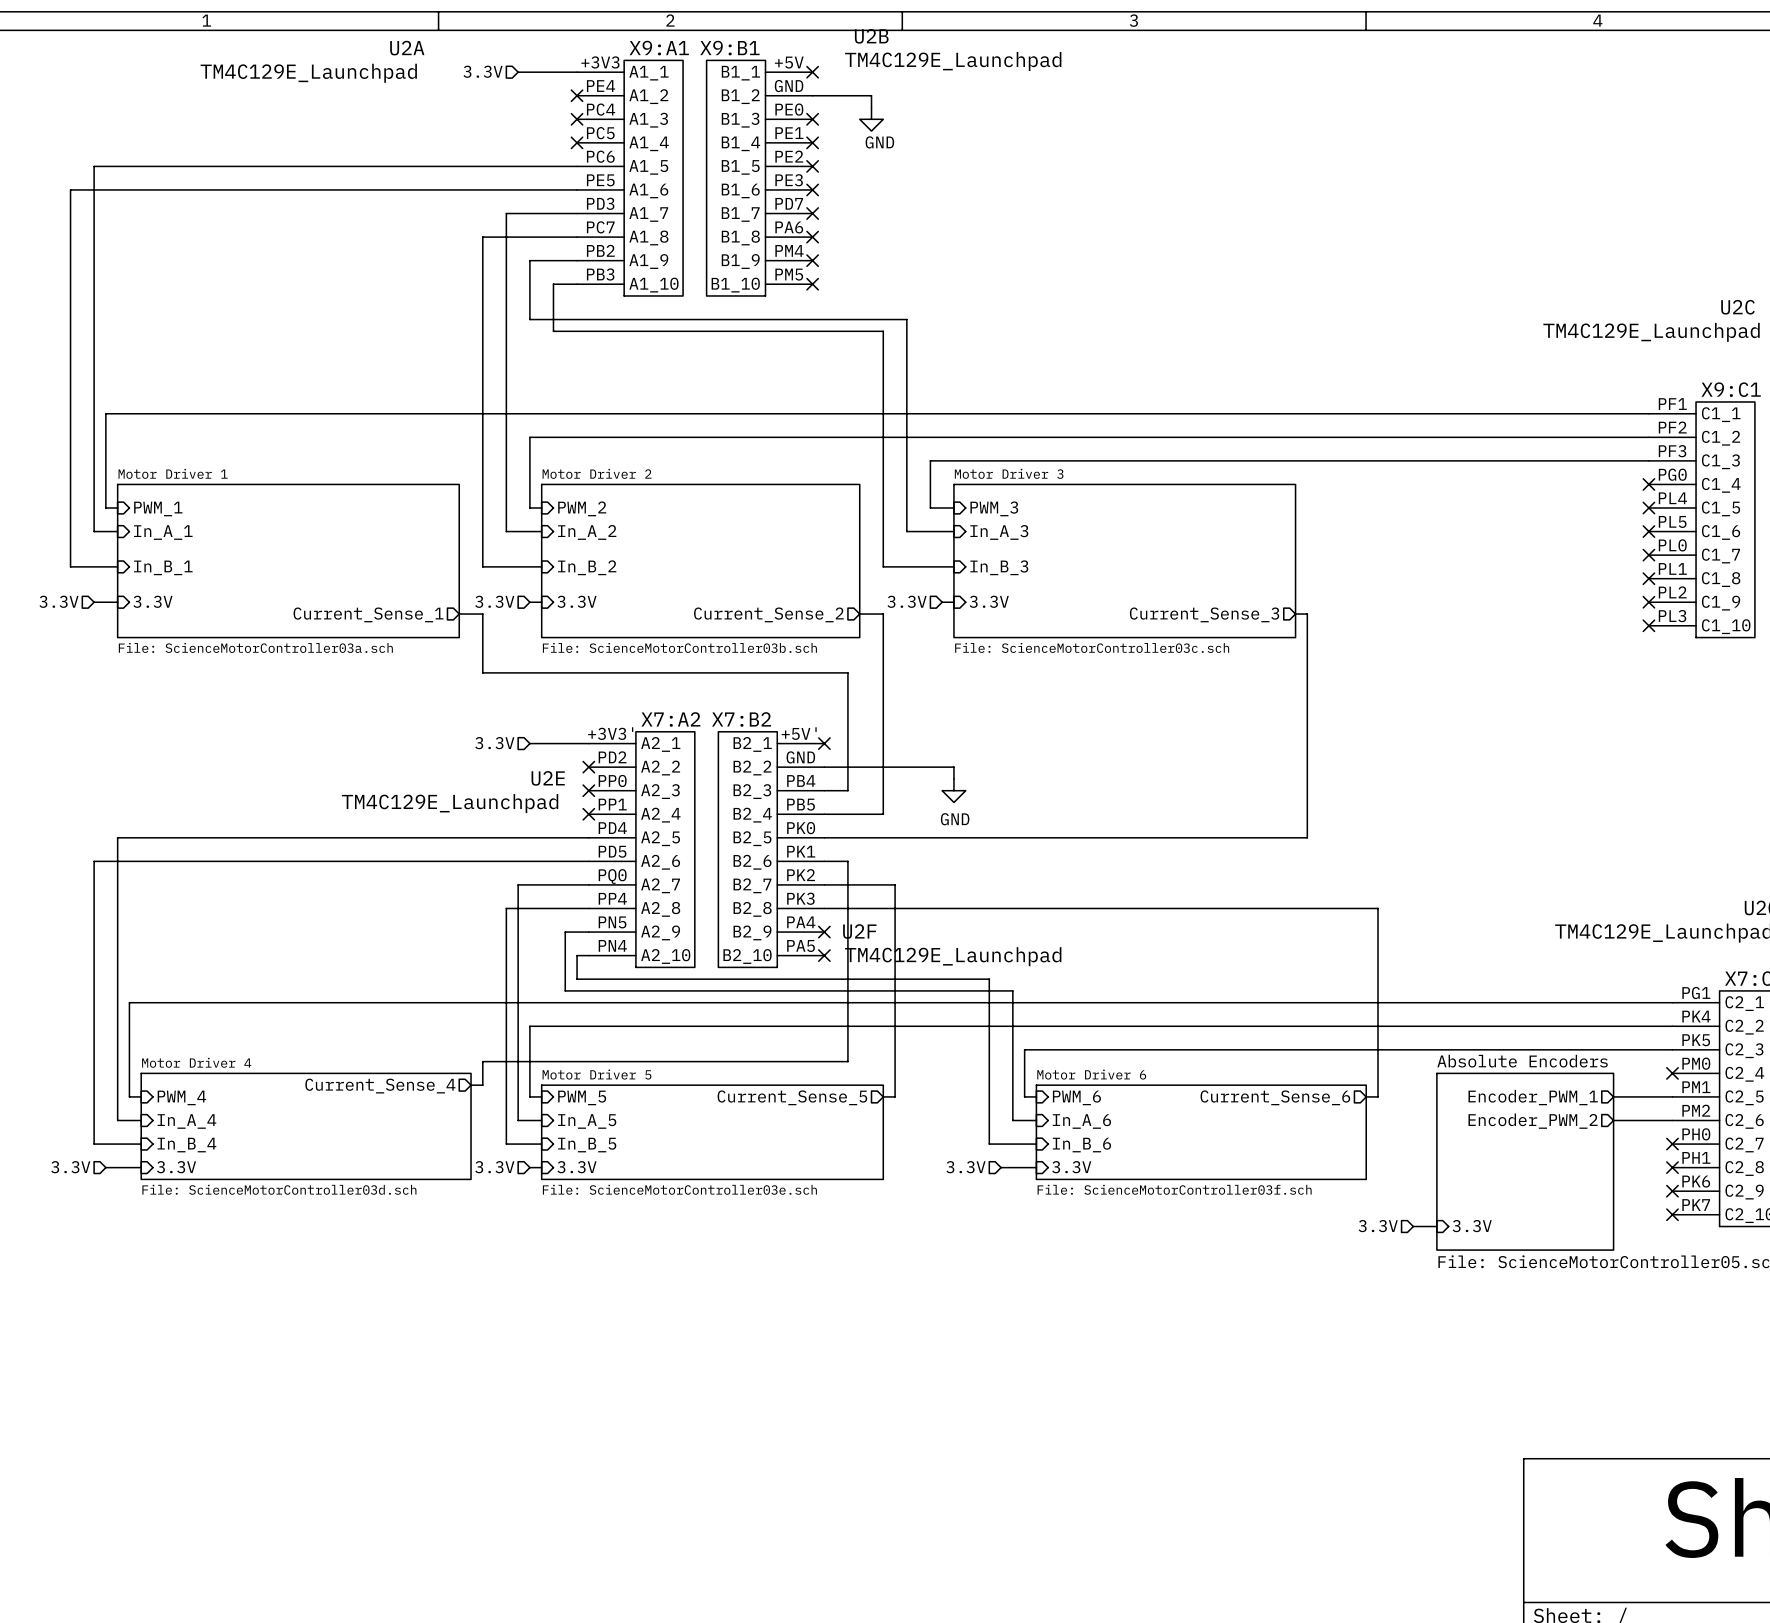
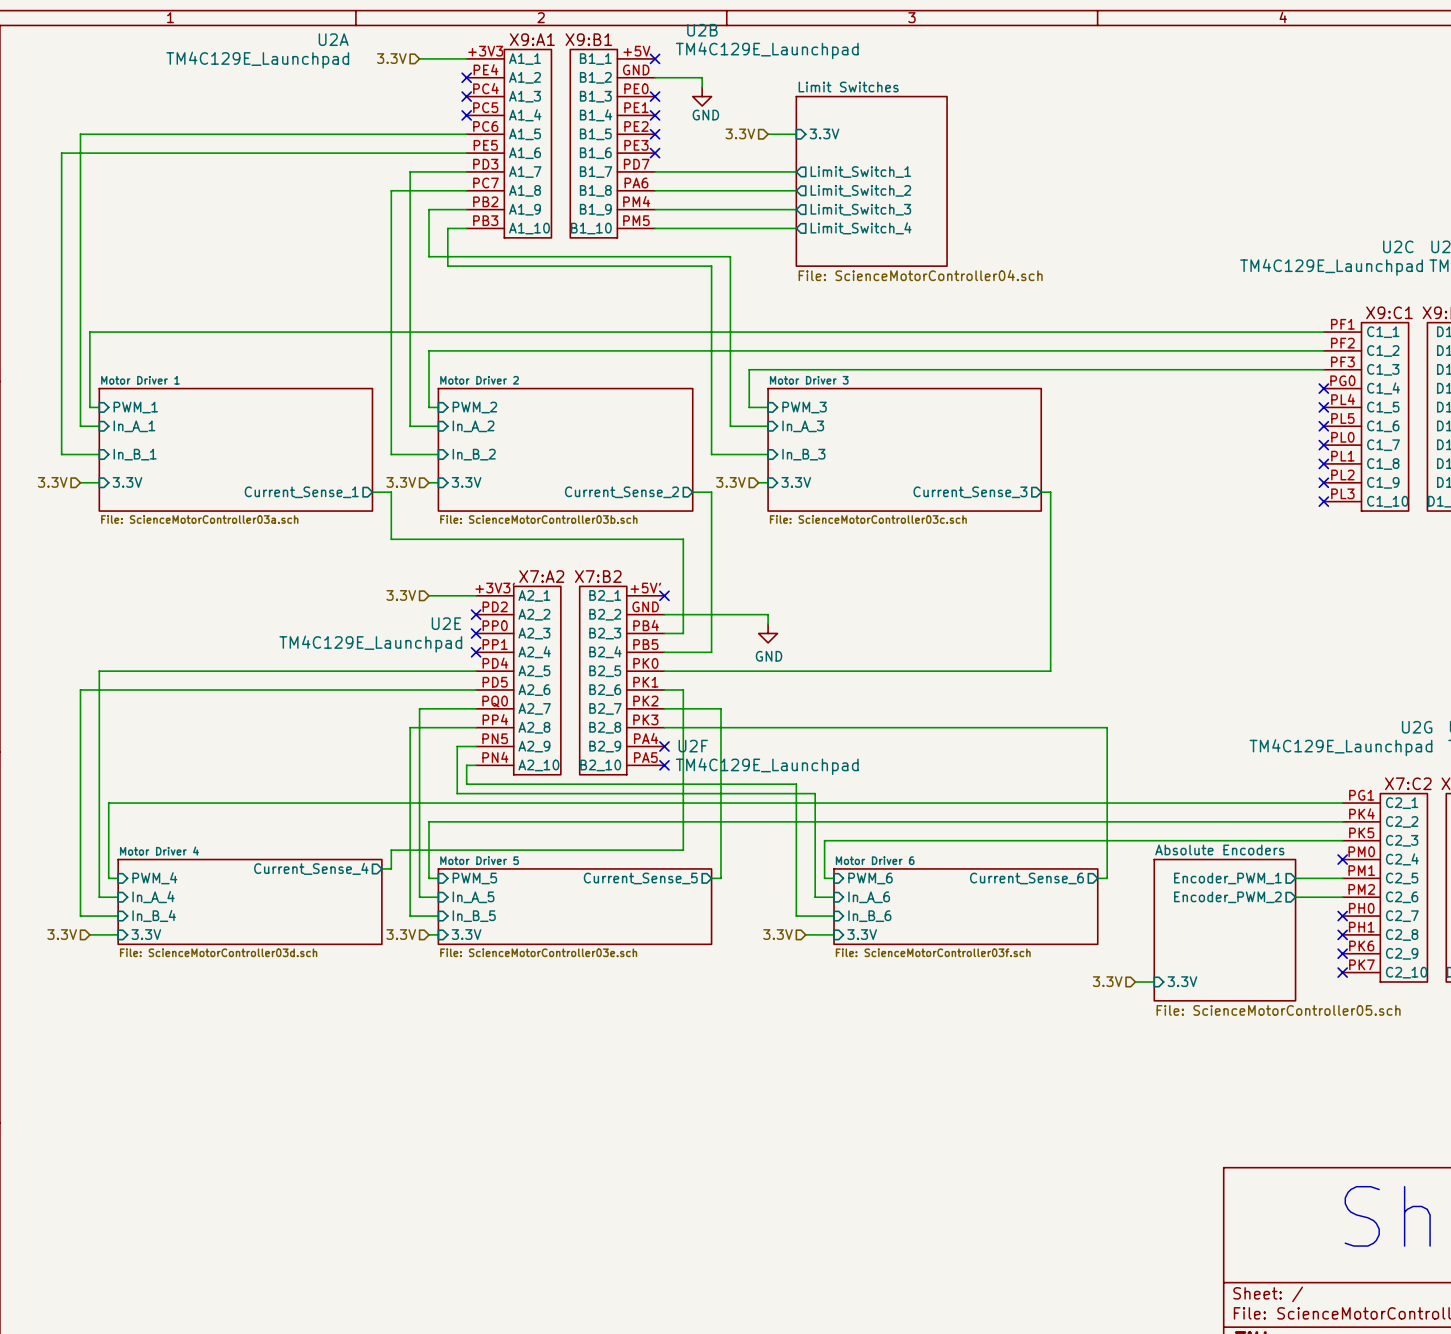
hierarchical label: none -> 3.3V (740, 133)
sheet pin: none -> 3.3V (824, 133)
wire: none -> (768, 134) (796, 134)
wire: none -> (655, 171) (796, 171)
no-connect mark: (812, 213) -> none
sheet pin: none -> Limit_Switch_1 (860, 172)
sheet Limit Switches: none -> File: ScienceMotorController04.sch (871, 181)
wire: none -> (655, 190) (796, 190)
no-connect mark: (812, 237) -> none
sheet pin: none -> Limit_Switch_2 (860, 190)
wire: none -> (655, 209) (796, 209)
no-connect mark: (812, 260) -> none
sheet pin: none -> Limit_Switch_3 (860, 209)
wire: none -> (655, 228) (796, 228)
no-connect mark: (812, 284) -> none
sheet pin: none -> Limit_Switch_4 (861, 228)

